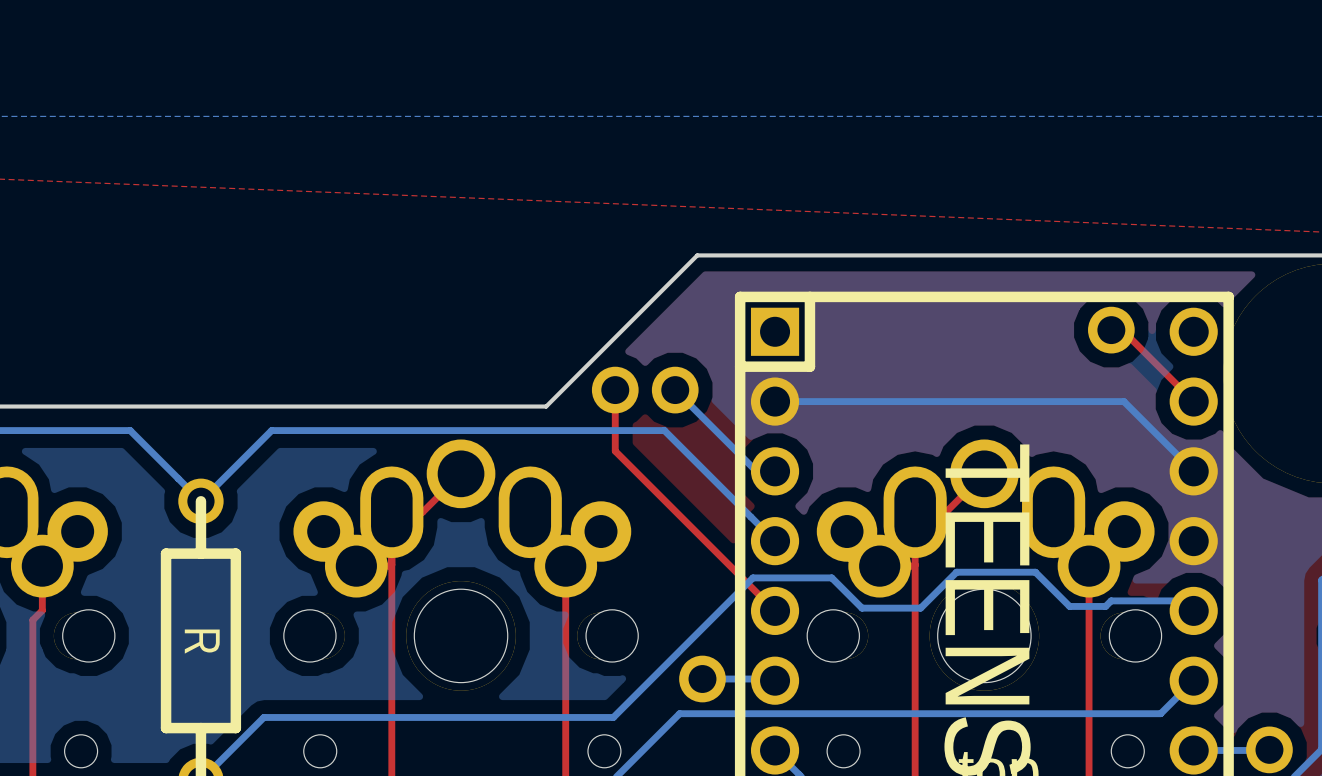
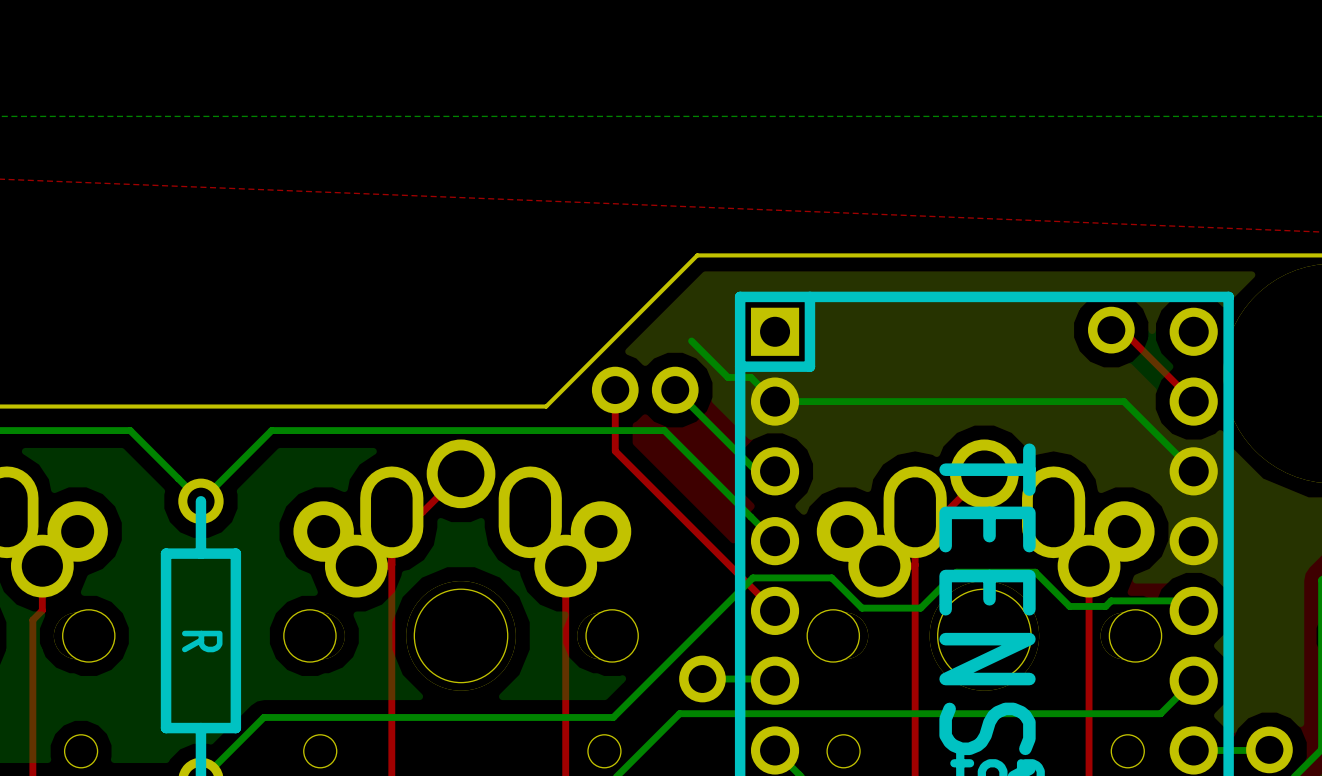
bottom track: none -> (691, 341) (728, 377) (750, 377) (775, 401)

